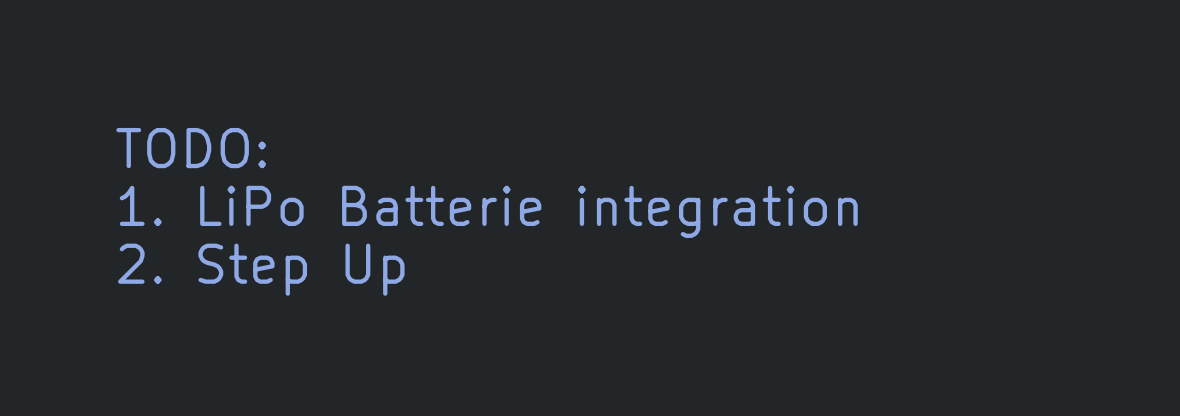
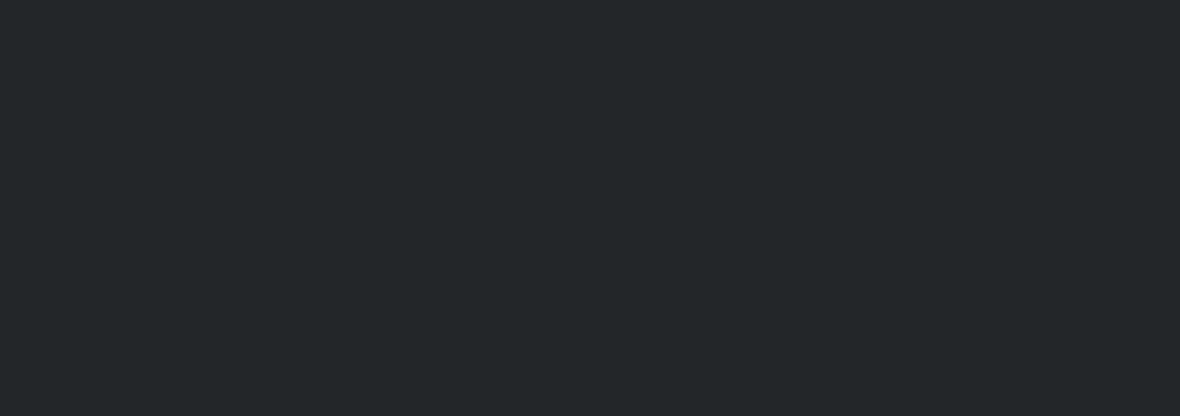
text: TODO: (191, 148) -> none
text: 1. LiPo Batterie integration (488, 211) -> none
text: 2. Step Up (261, 269) -> none

